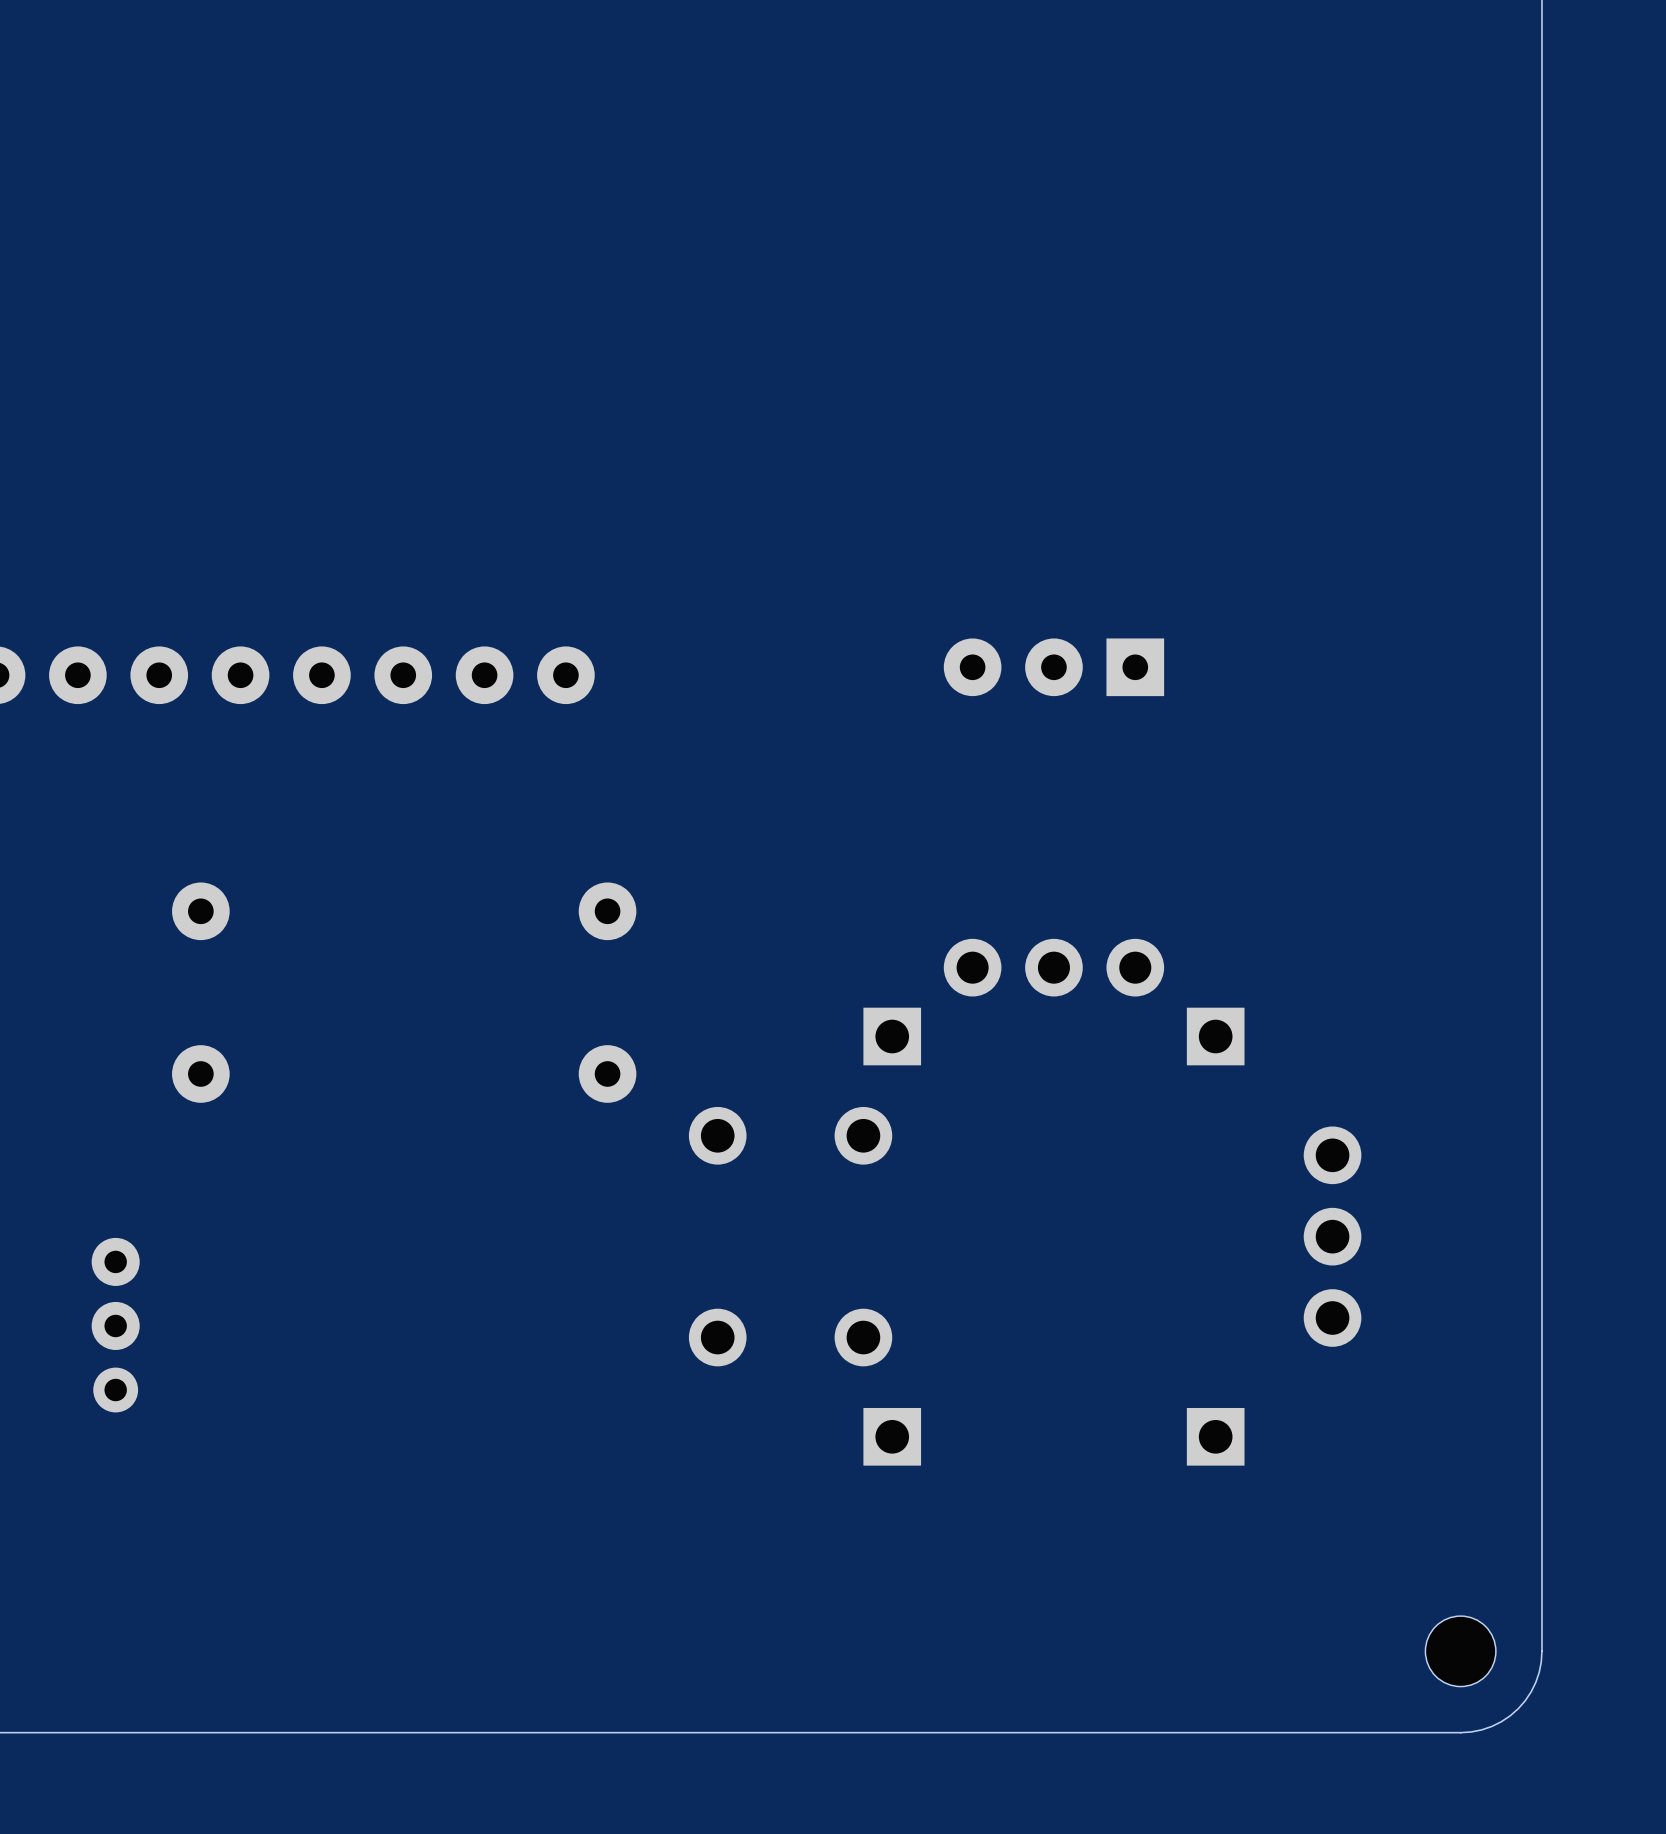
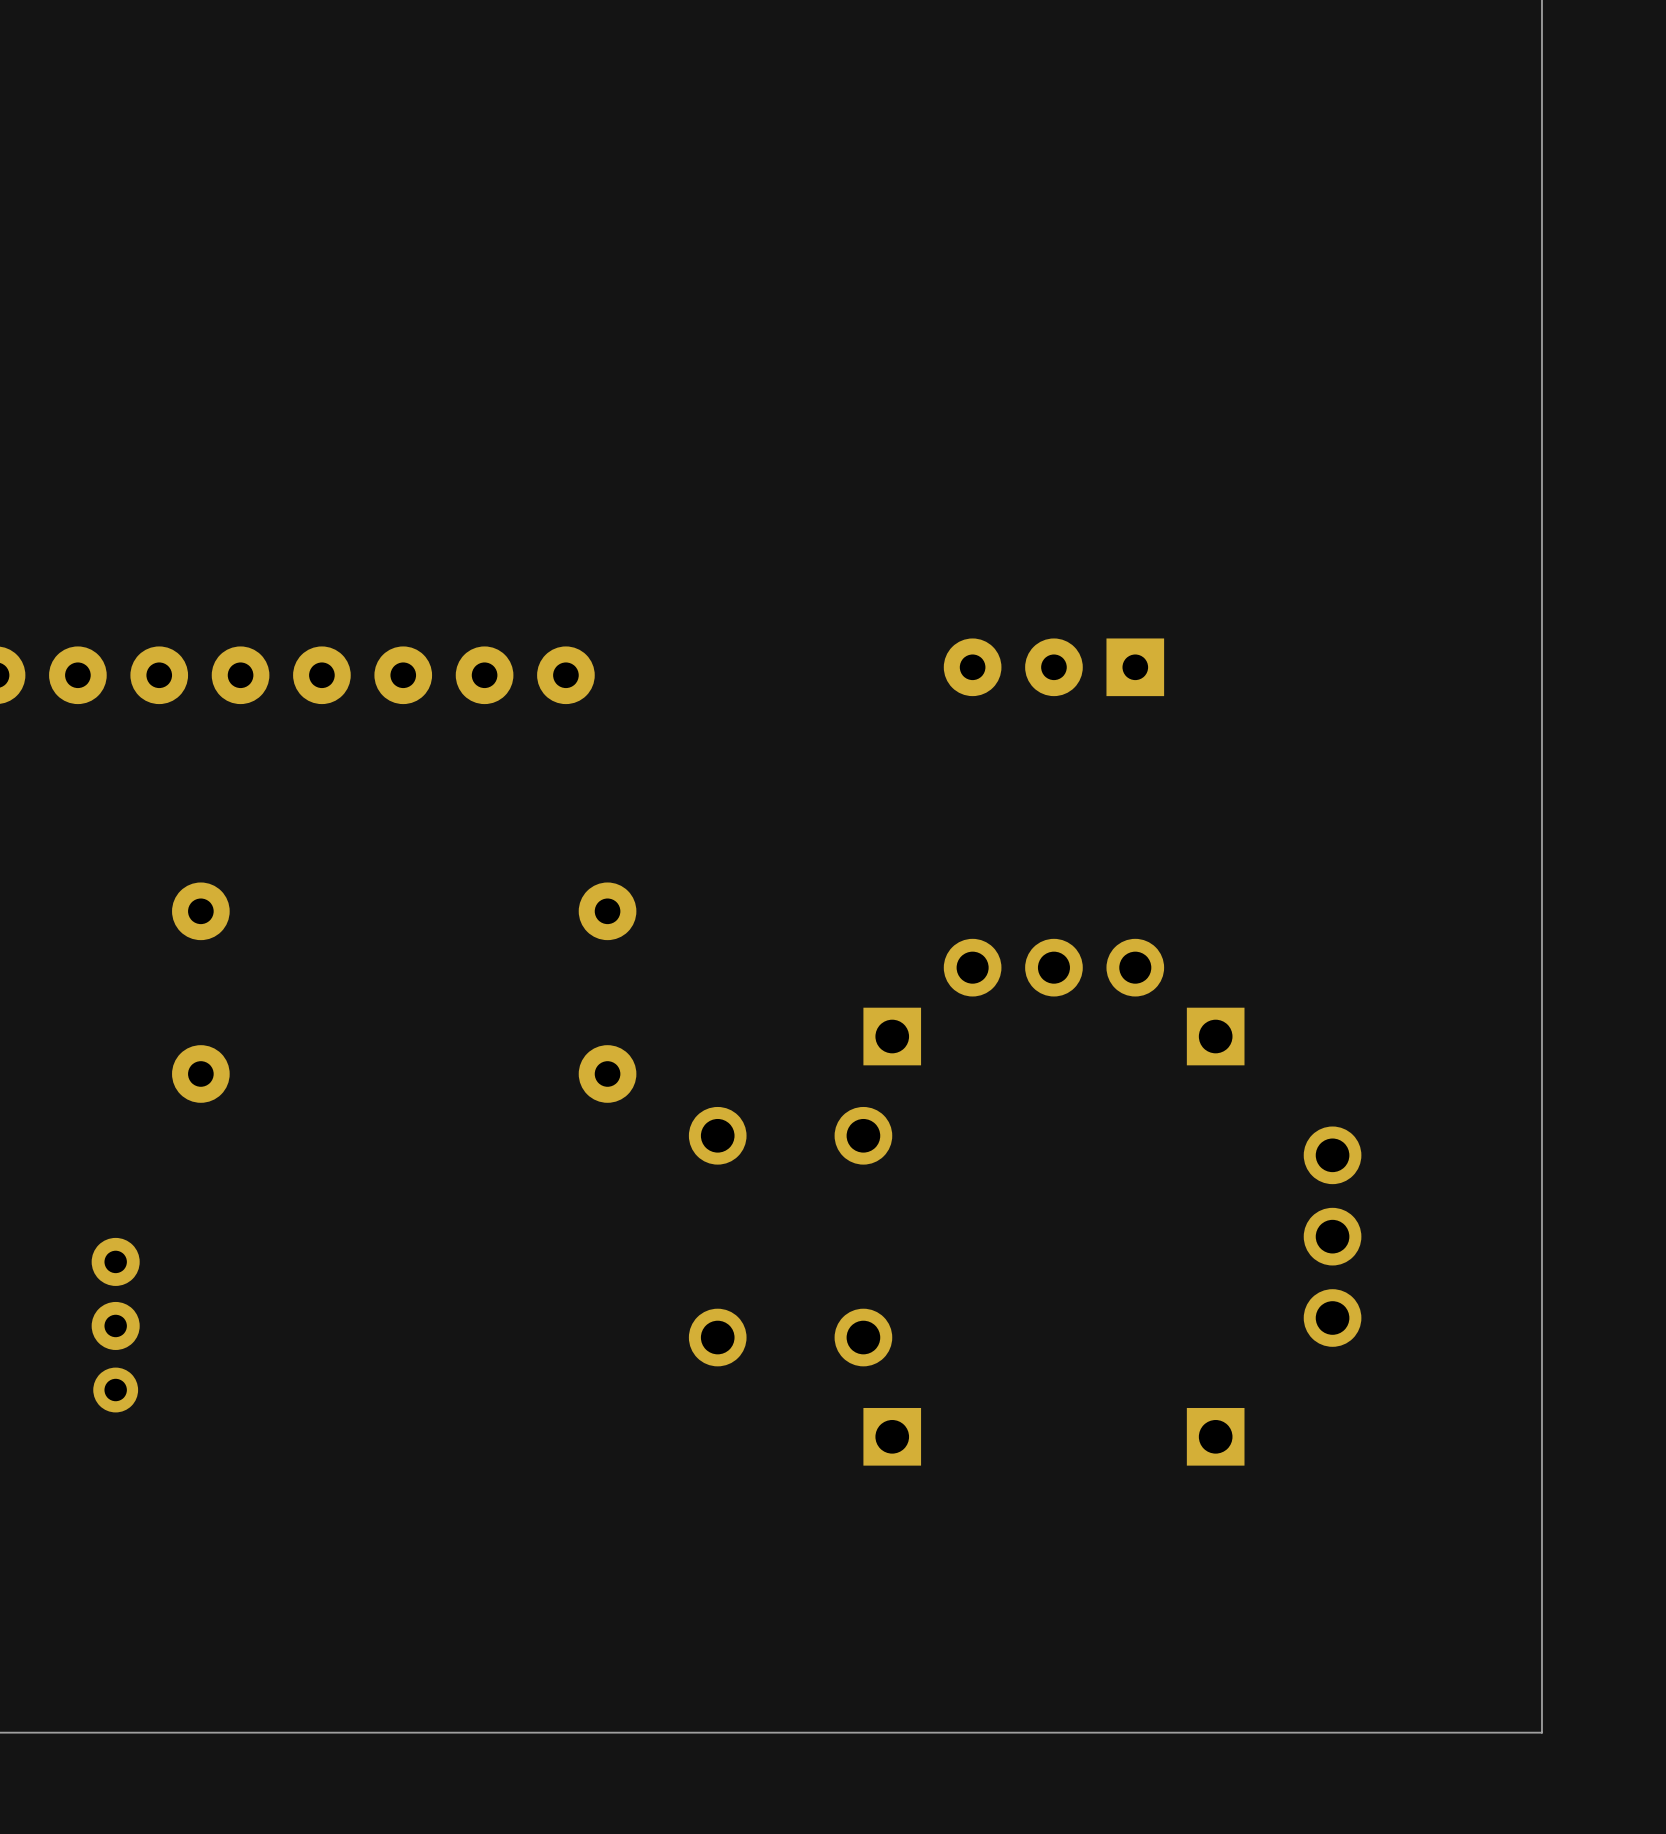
part: (1460, 1651) -> none
board edge: (1541, 1651) (1535, 1682) (1518, 1708) (1491, 1726) (1460, 1732) -> (1541, 1651) (1541, 1732) (1460, 1732)

